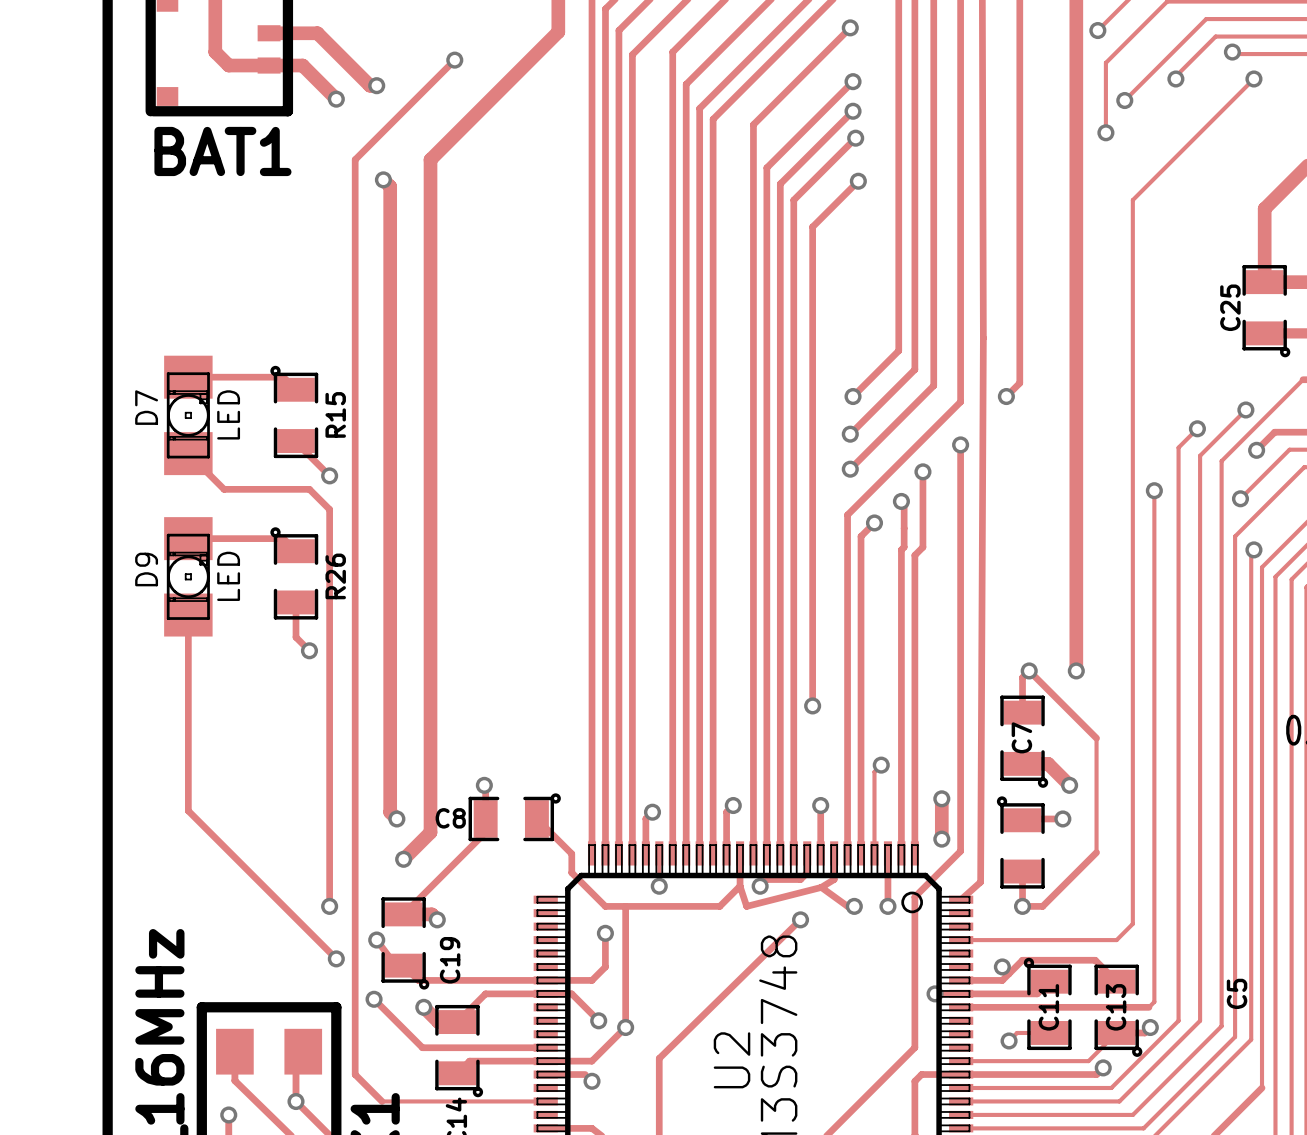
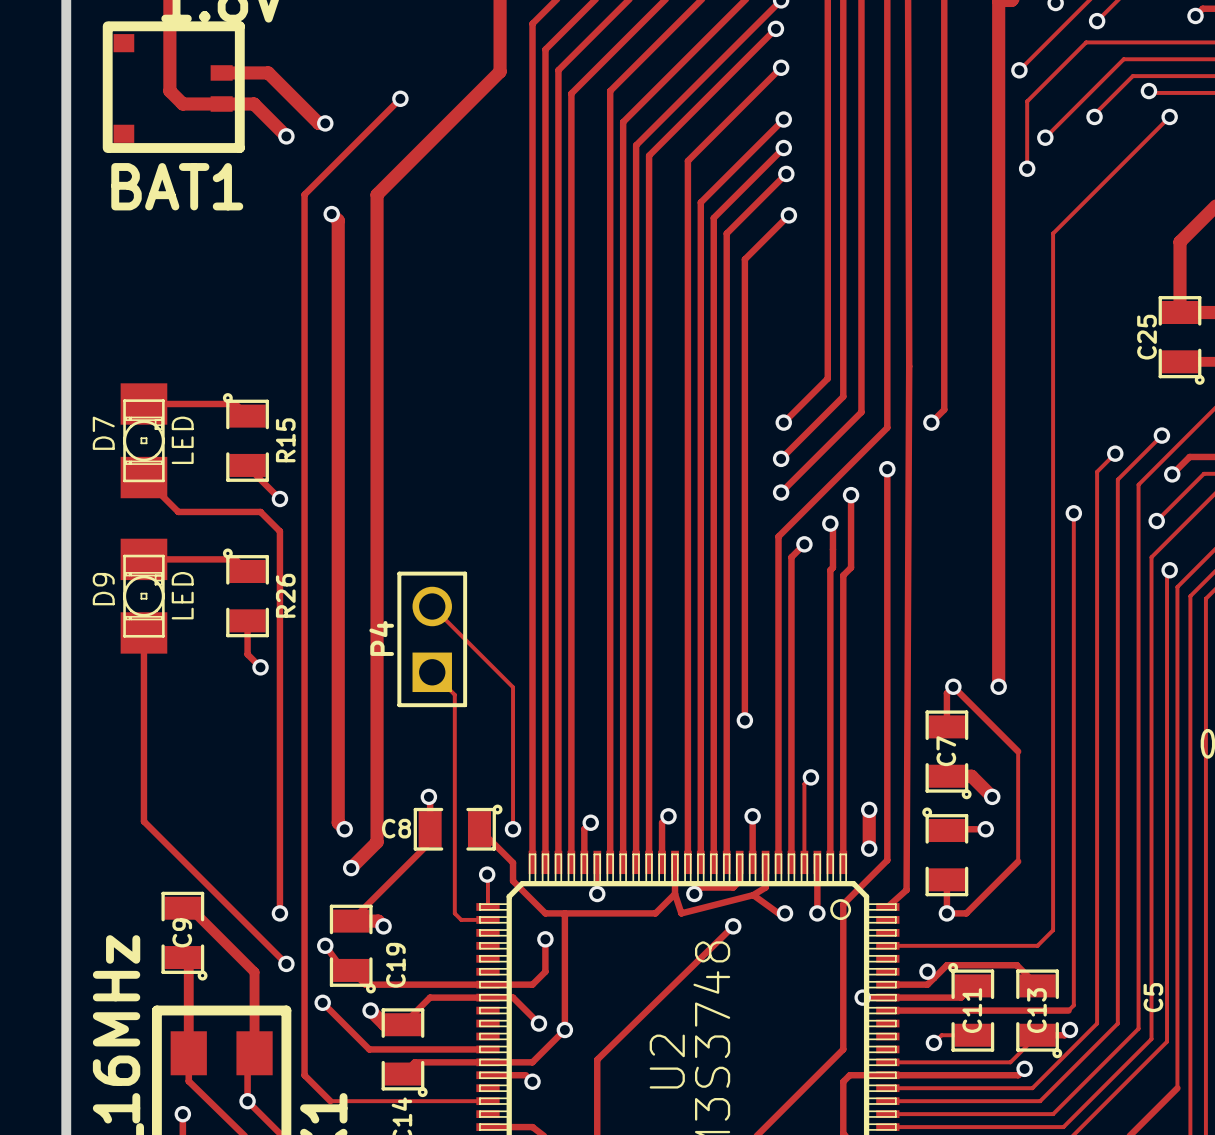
track: none -> (432, 606) (513, 687) (513, 829)
P4: none -> (432, 639)
track: none -> (432, 672) (454, 694) (454, 913) (461, 919) (487, 919)
via: none -> (513, 829)
track: none -> (487, 874) (487, 906)
via: none -> (487, 874)
track: none -> (182, 908) (190, 908) (254, 972) (254, 1053)
C9: none -> (184, 936)
track: none -> (182, 957) (188, 963) (188, 1053)

